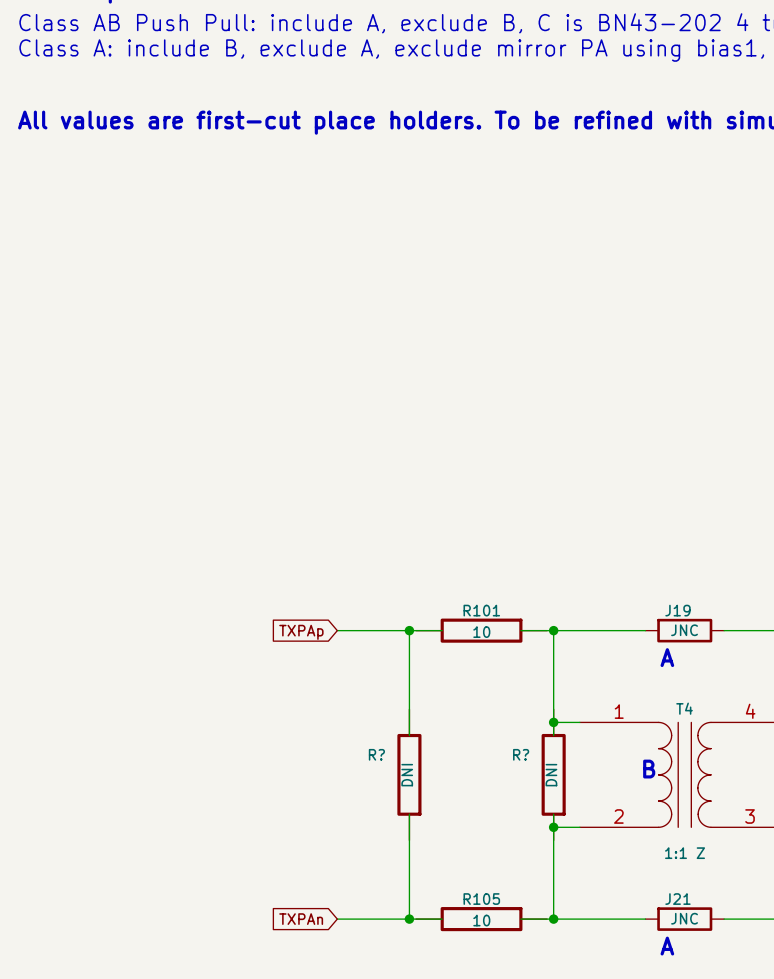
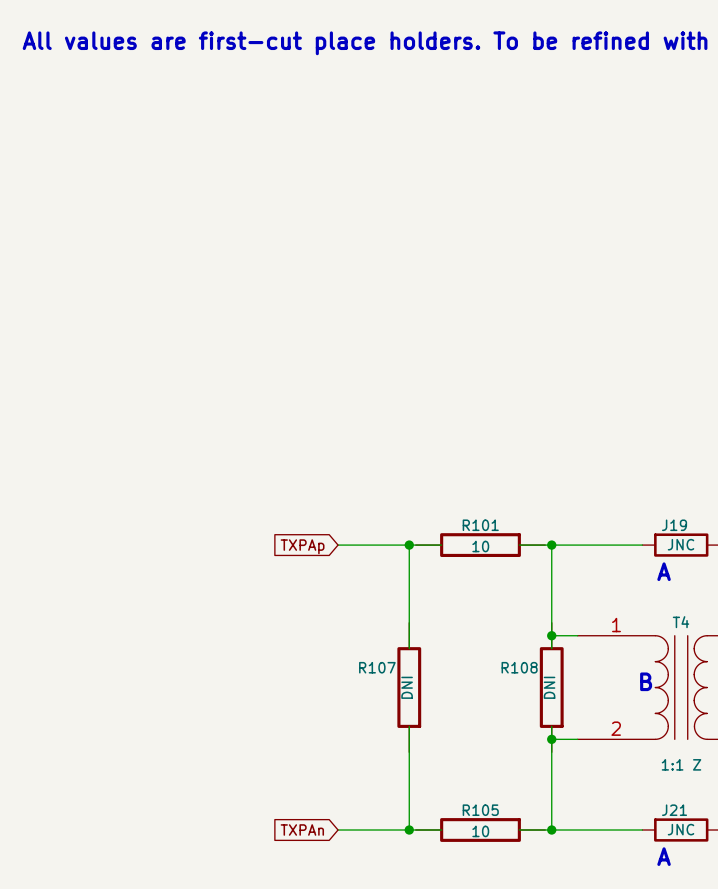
R? name: R? (376, 754) -> R107 (377, 667)
R? name: R? (521, 754) -> R108 (519, 667)

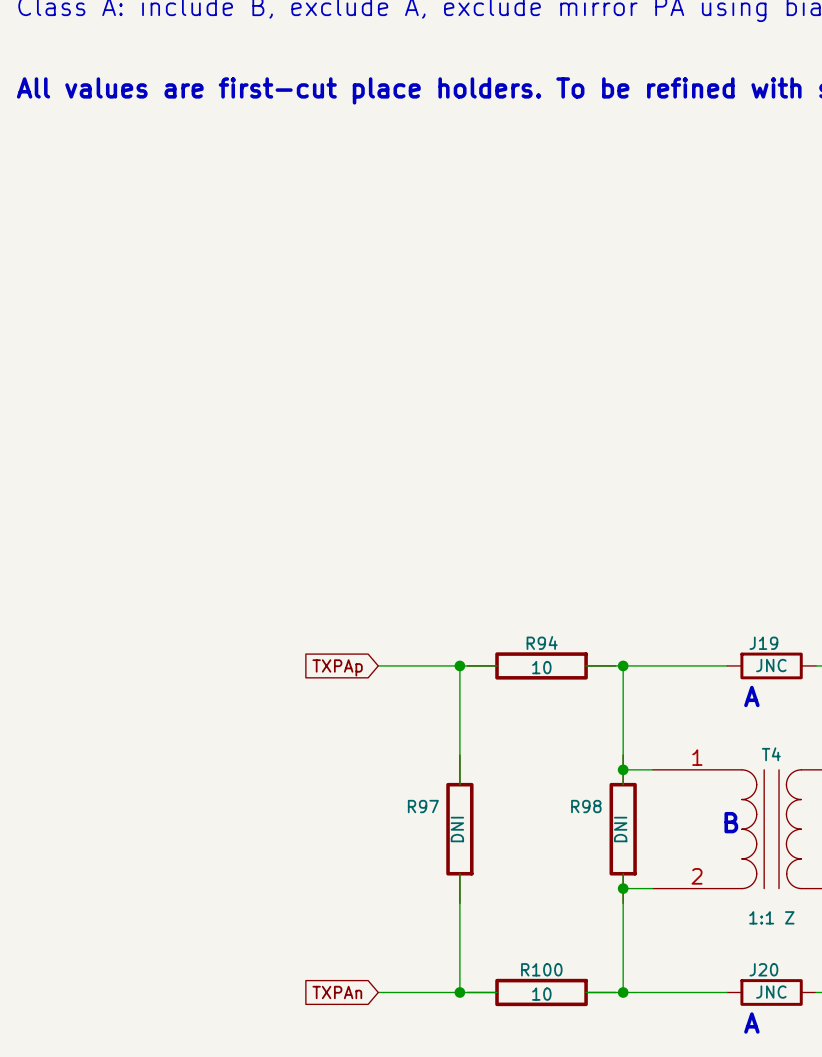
R101 name: R101 (480, 525) -> R94 (542, 642)
R107 name: R107 (377, 667) -> R97 (423, 806)
R108 name: R108 (519, 667) -> R98 (586, 806)
R105 name: R105 (480, 810) -> R100 (541, 969)
J21 name: J21 (674, 810) -> J20 (763, 969)

